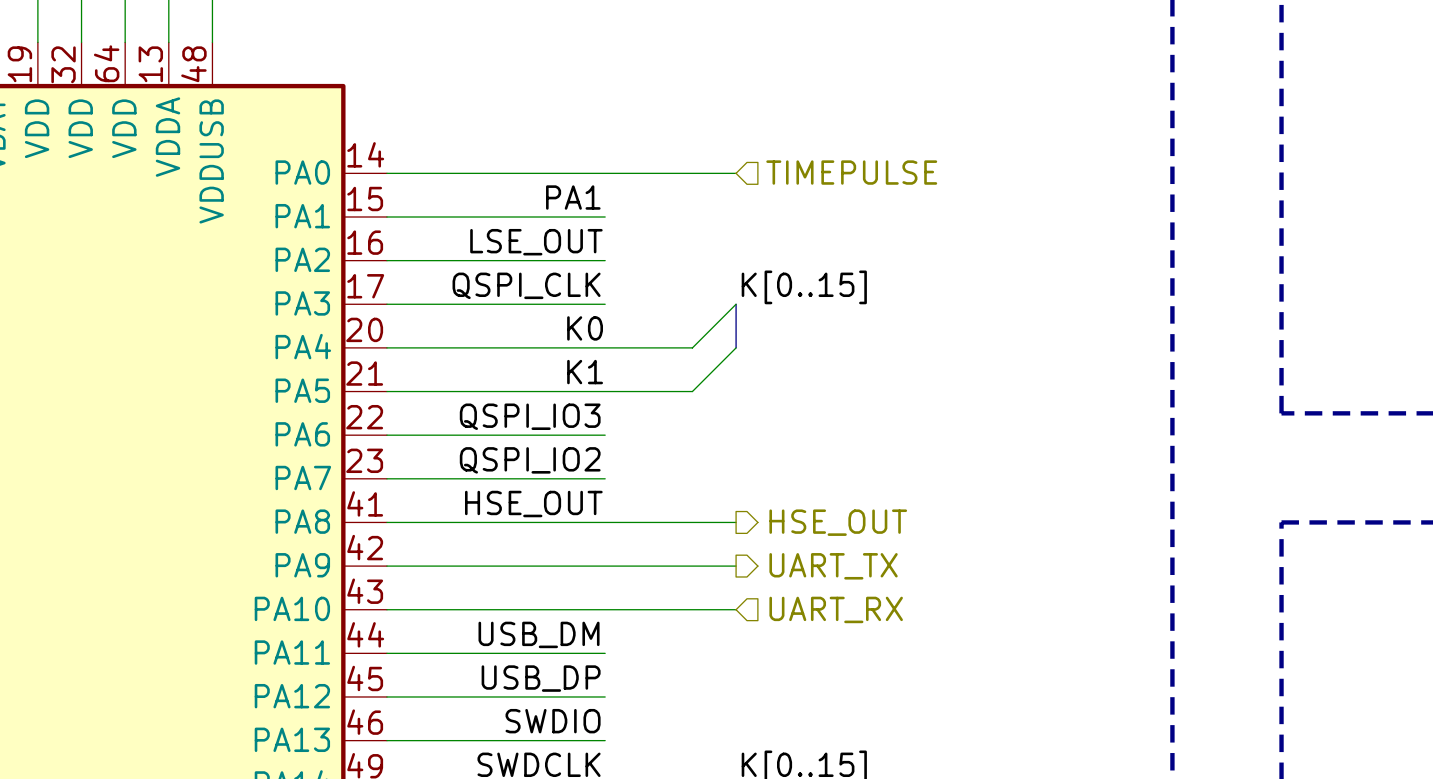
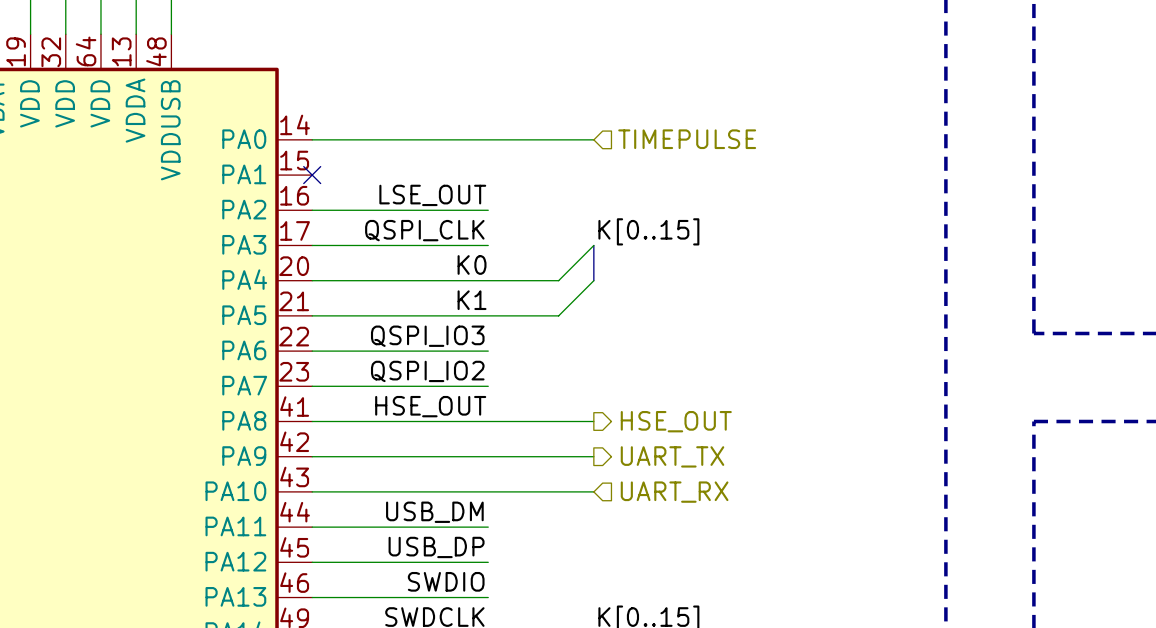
label: PA1 (573, 197) -> none
wire: (386, 216) (605, 216) -> none
no-connect mark: none -> (312, 175)

